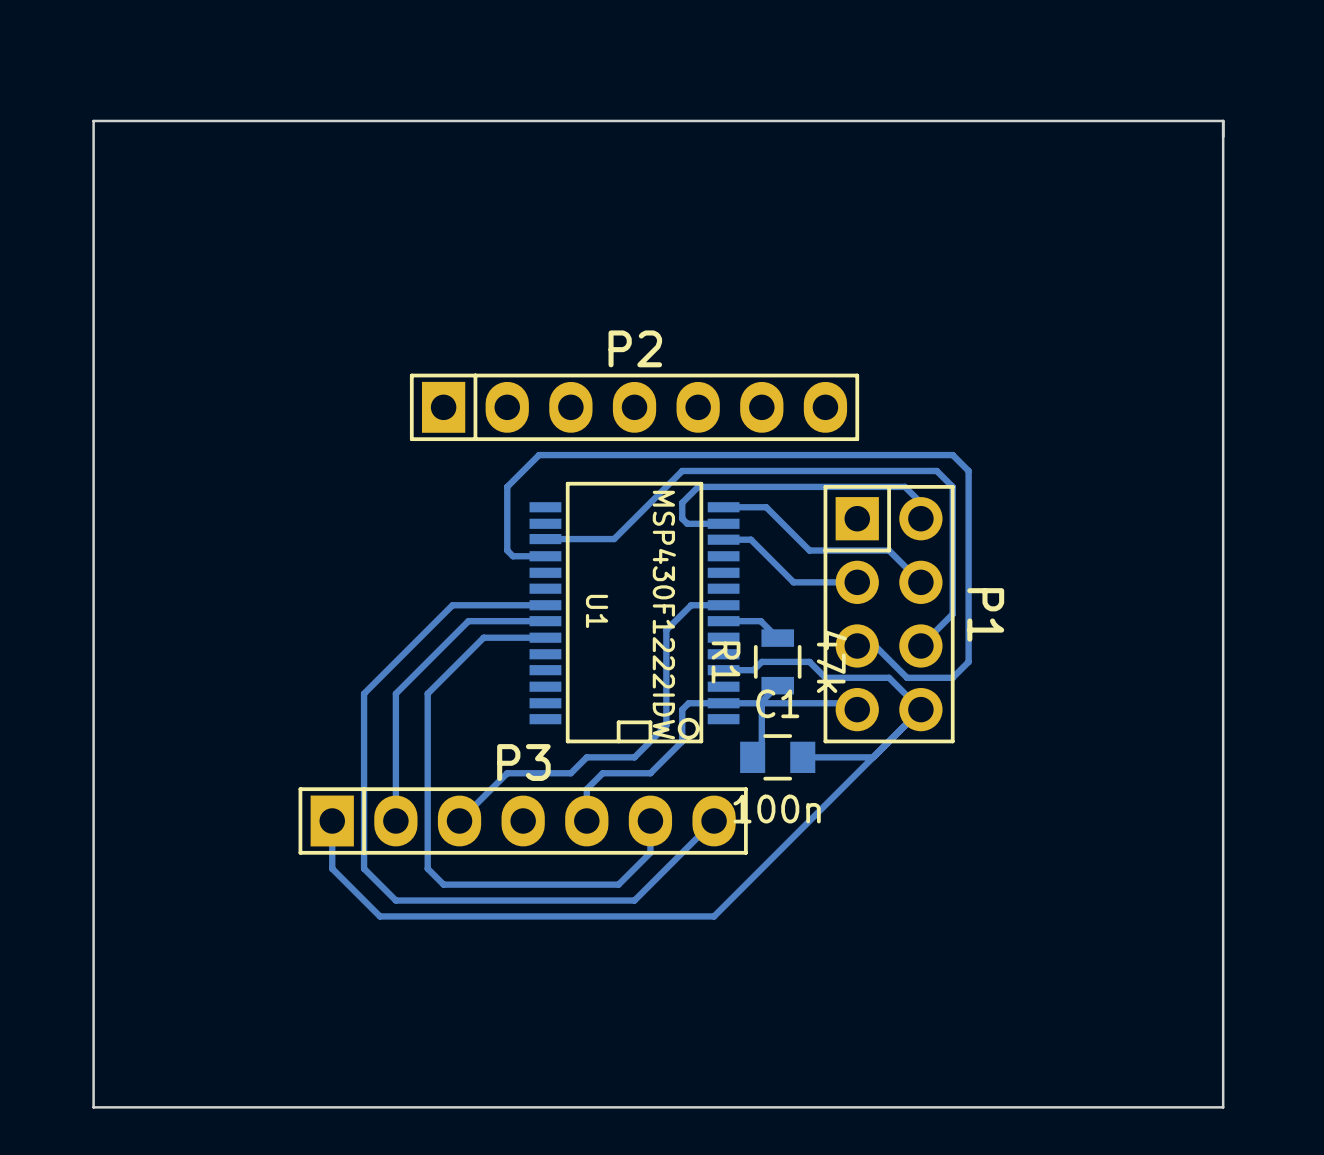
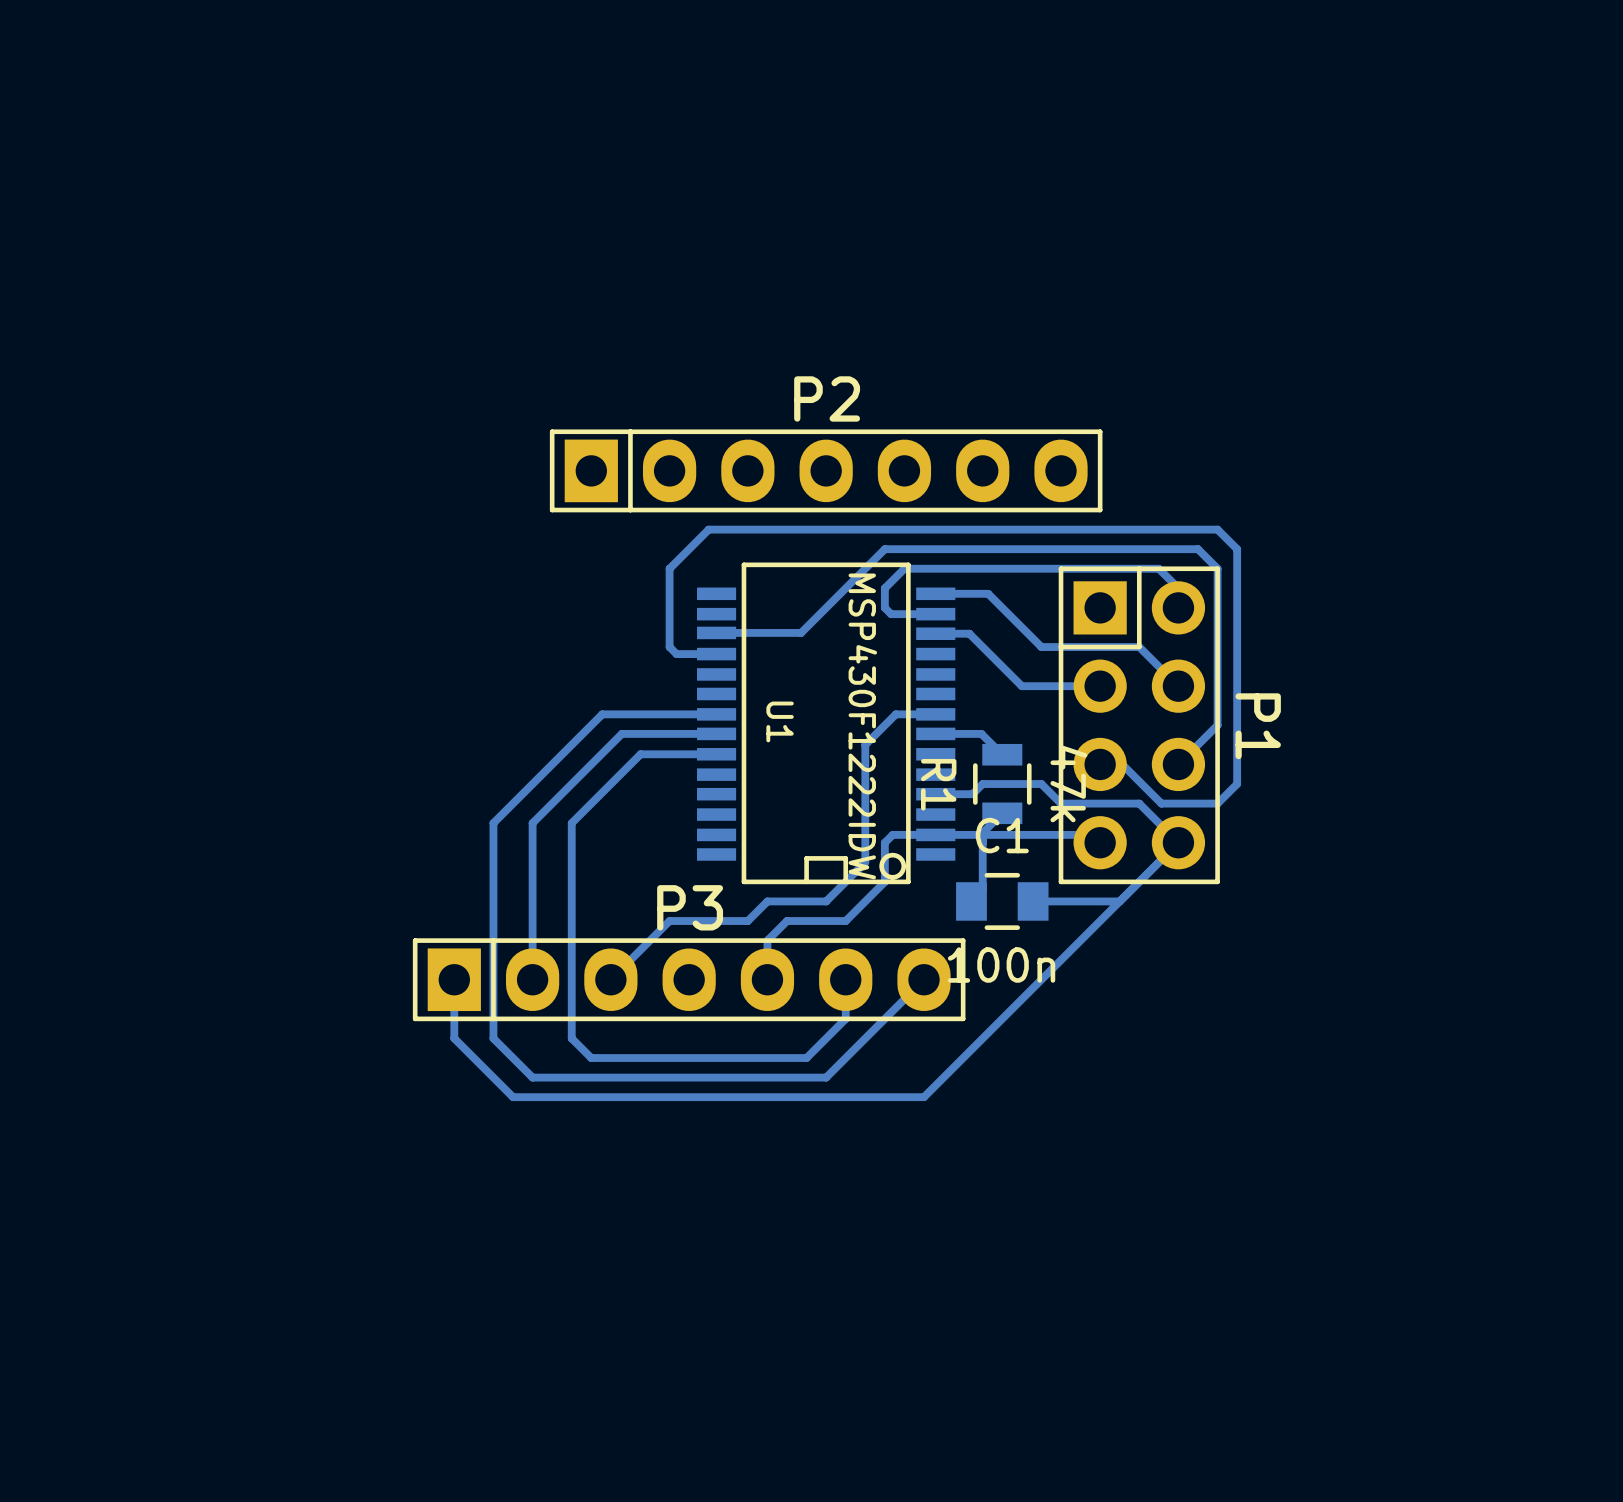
board edge: (1223, 120) (1223, 1107) (93, 1107) (93, 120) (1223, 120) -> none

